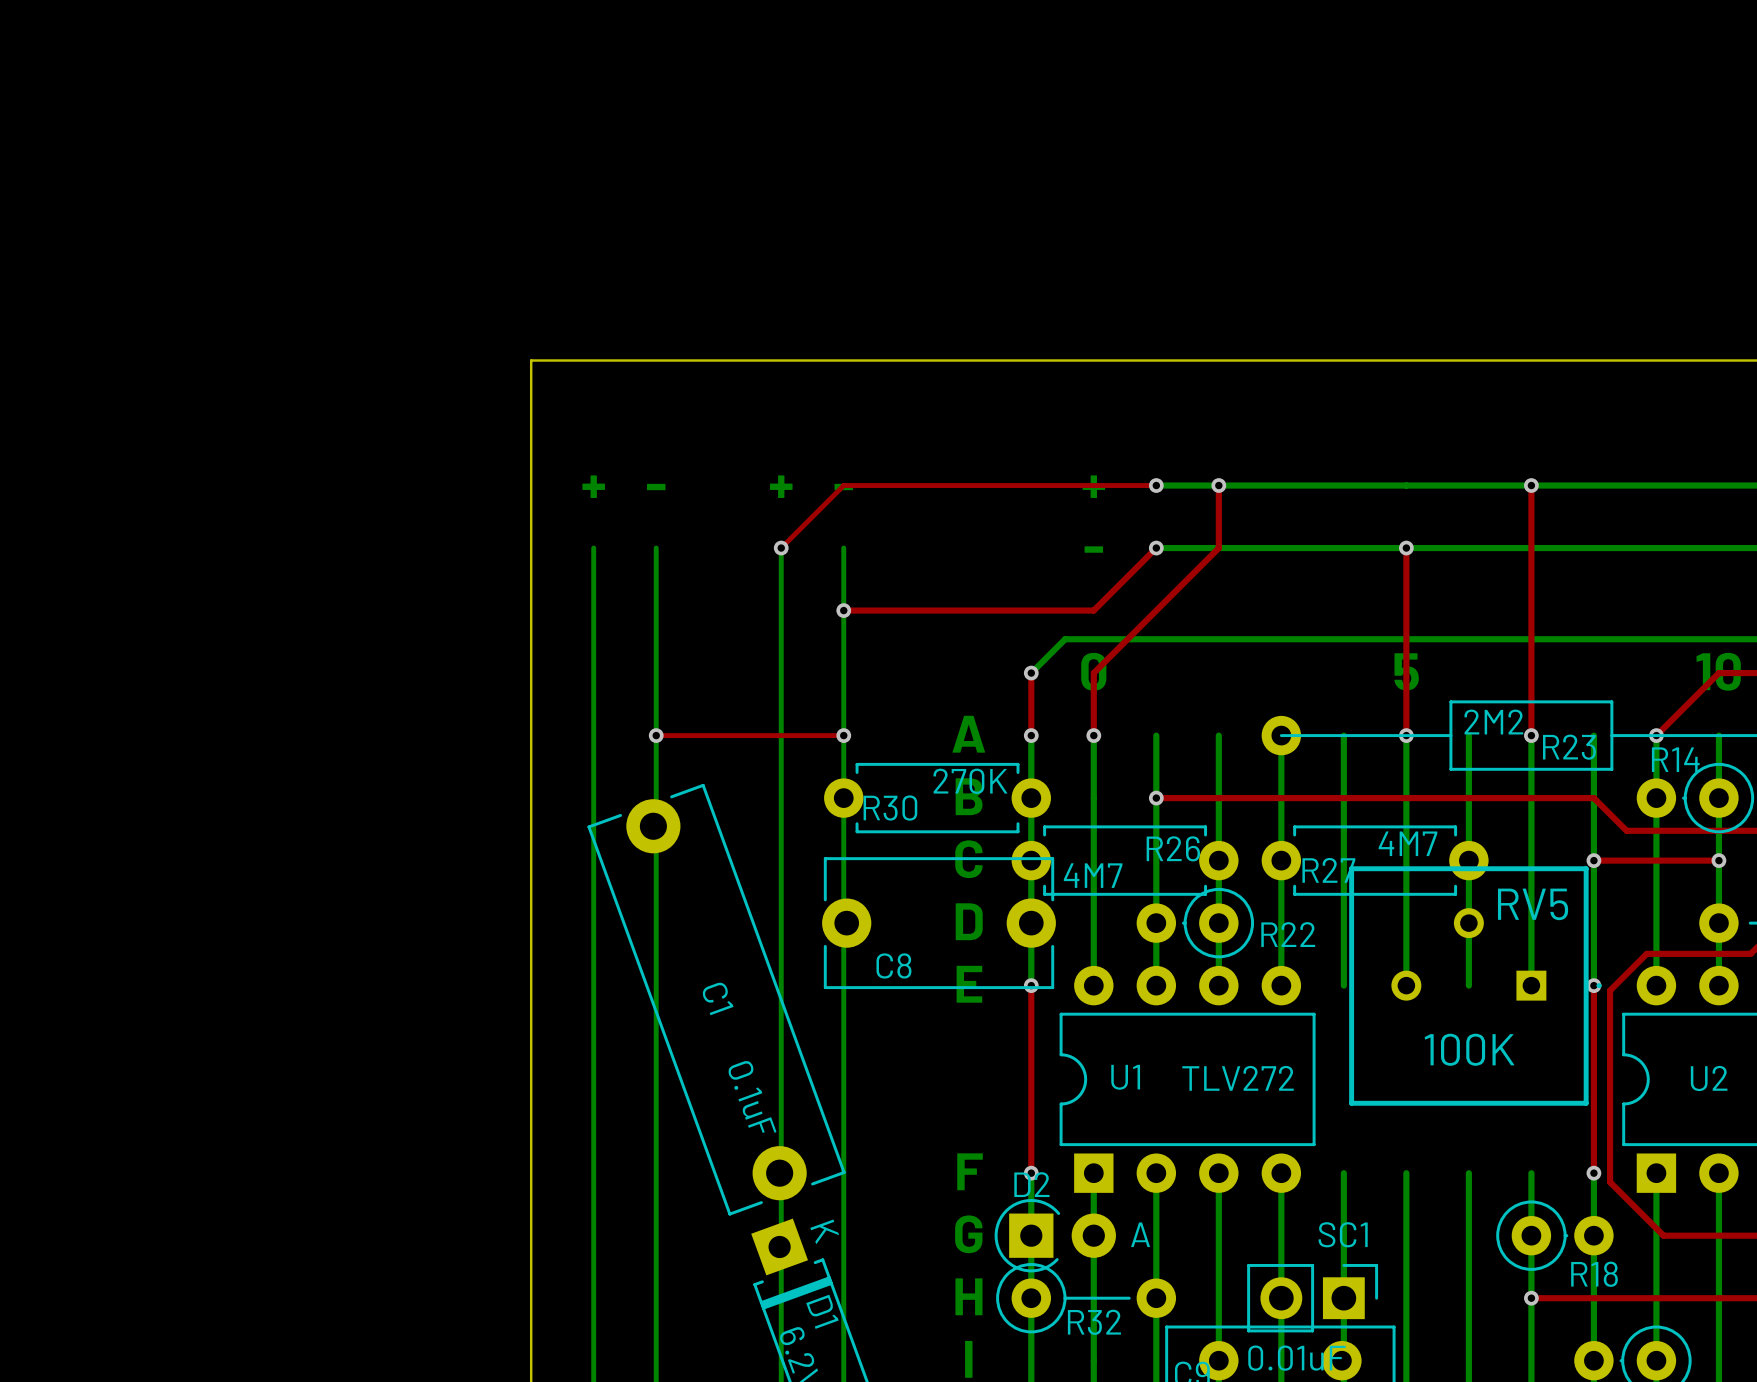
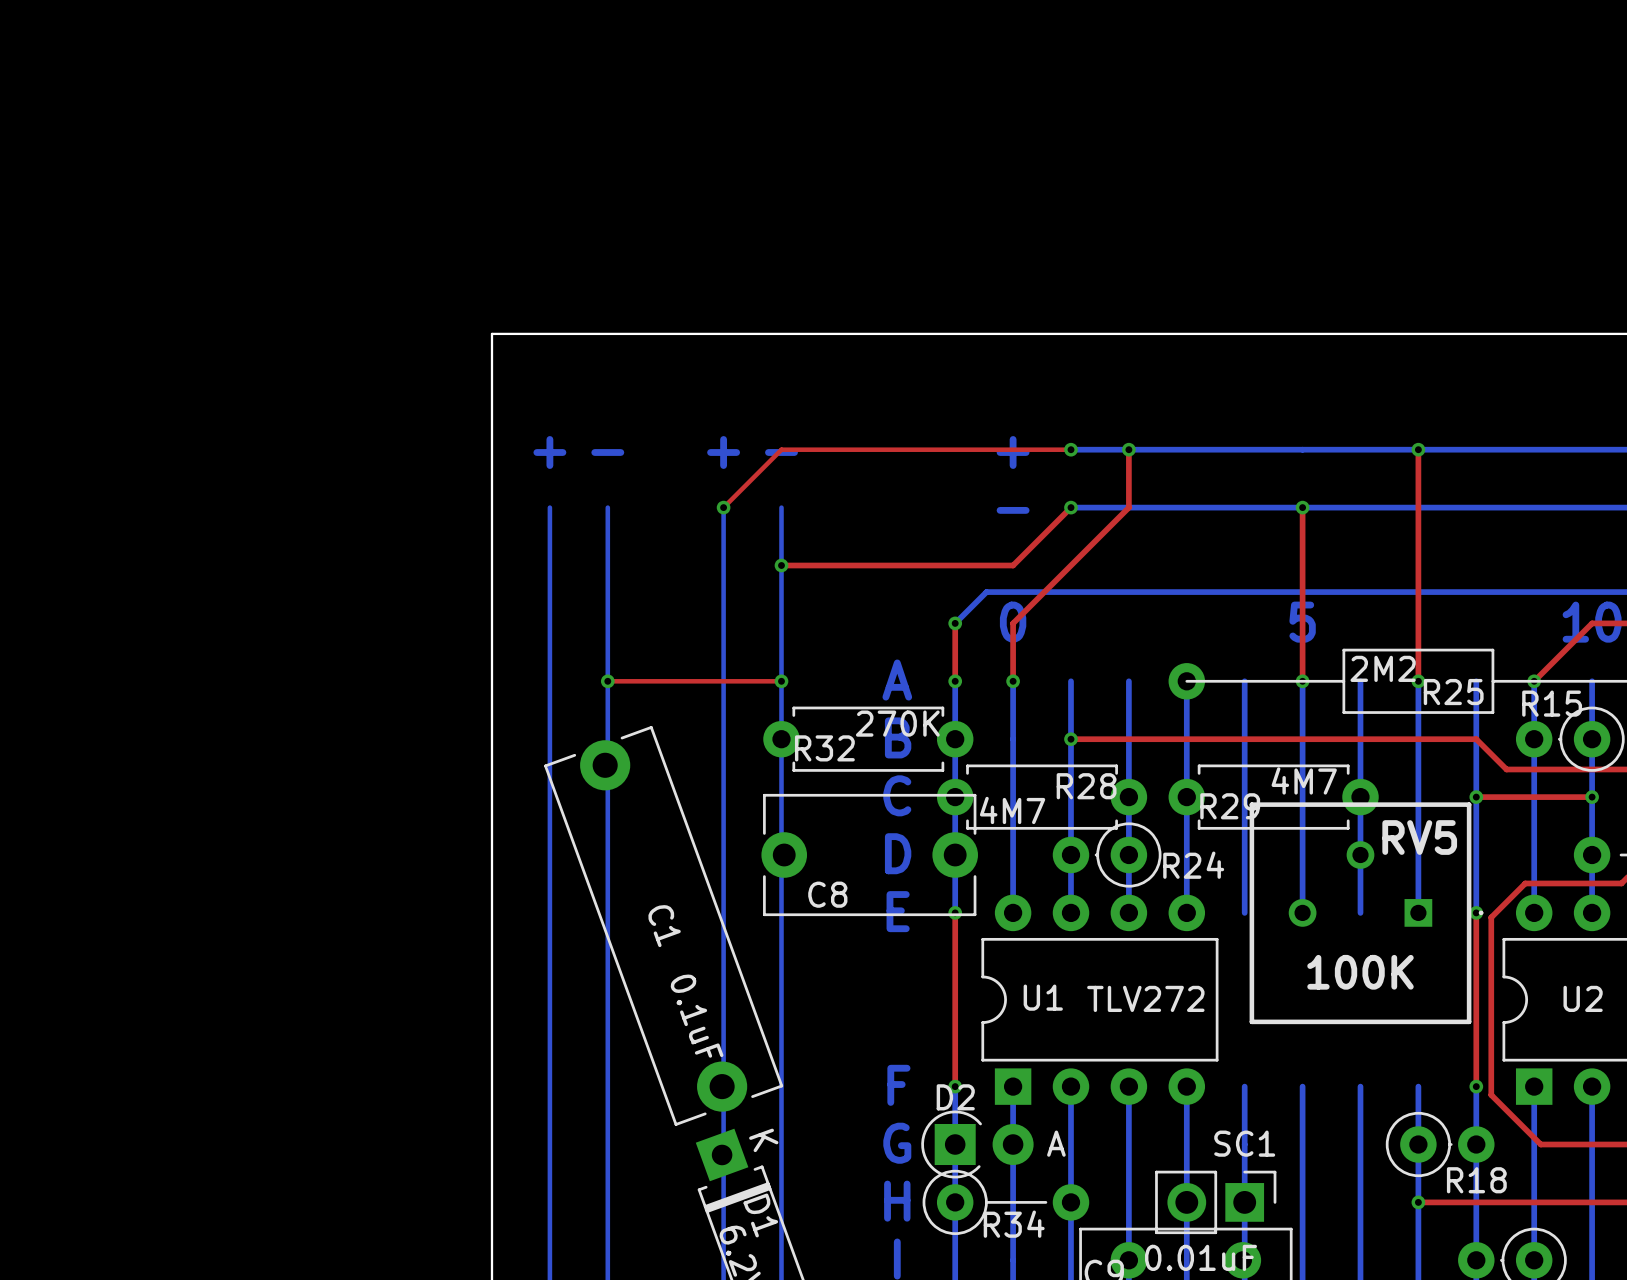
R23 name: R23 (1569, 747) -> R25 (1453, 692)
R14 name: R14 (1675, 759) -> R15 (1552, 703)
R30 name: R30 (890, 808) -> R32 (824, 748)
R26 name: R26 (1173, 848) -> R28 (1086, 786)
R27 name: R27 (1328, 870) -> R29 (1230, 806)
R22 name: R22 (1288, 934) -> R24 (1193, 865)
R32 name: R32 (1094, 1322) -> R34 (1014, 1224)

